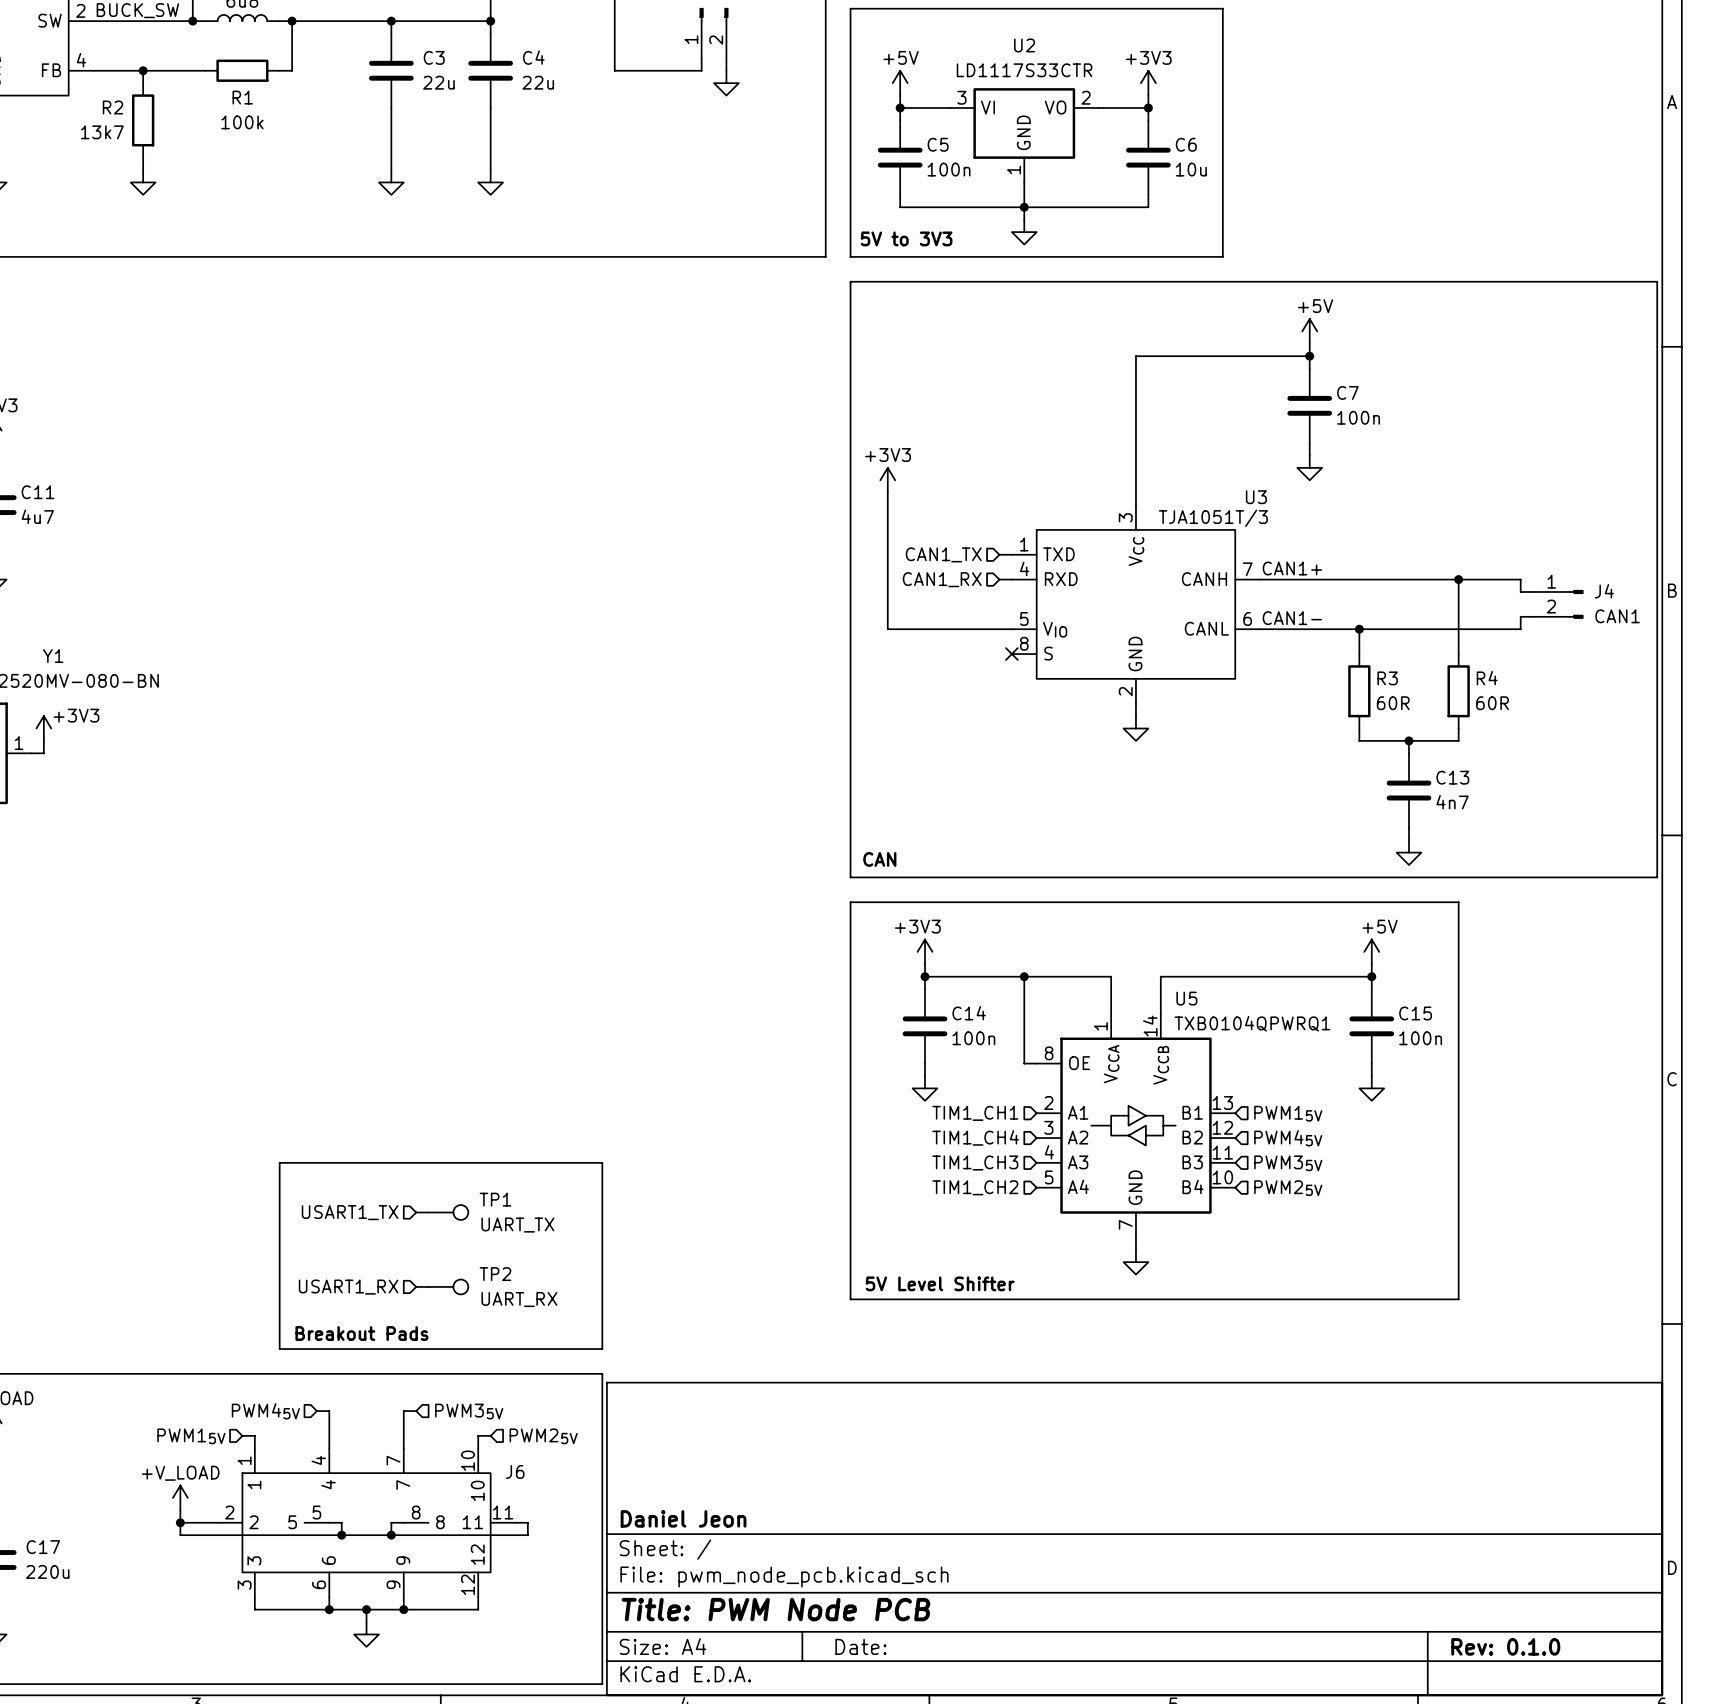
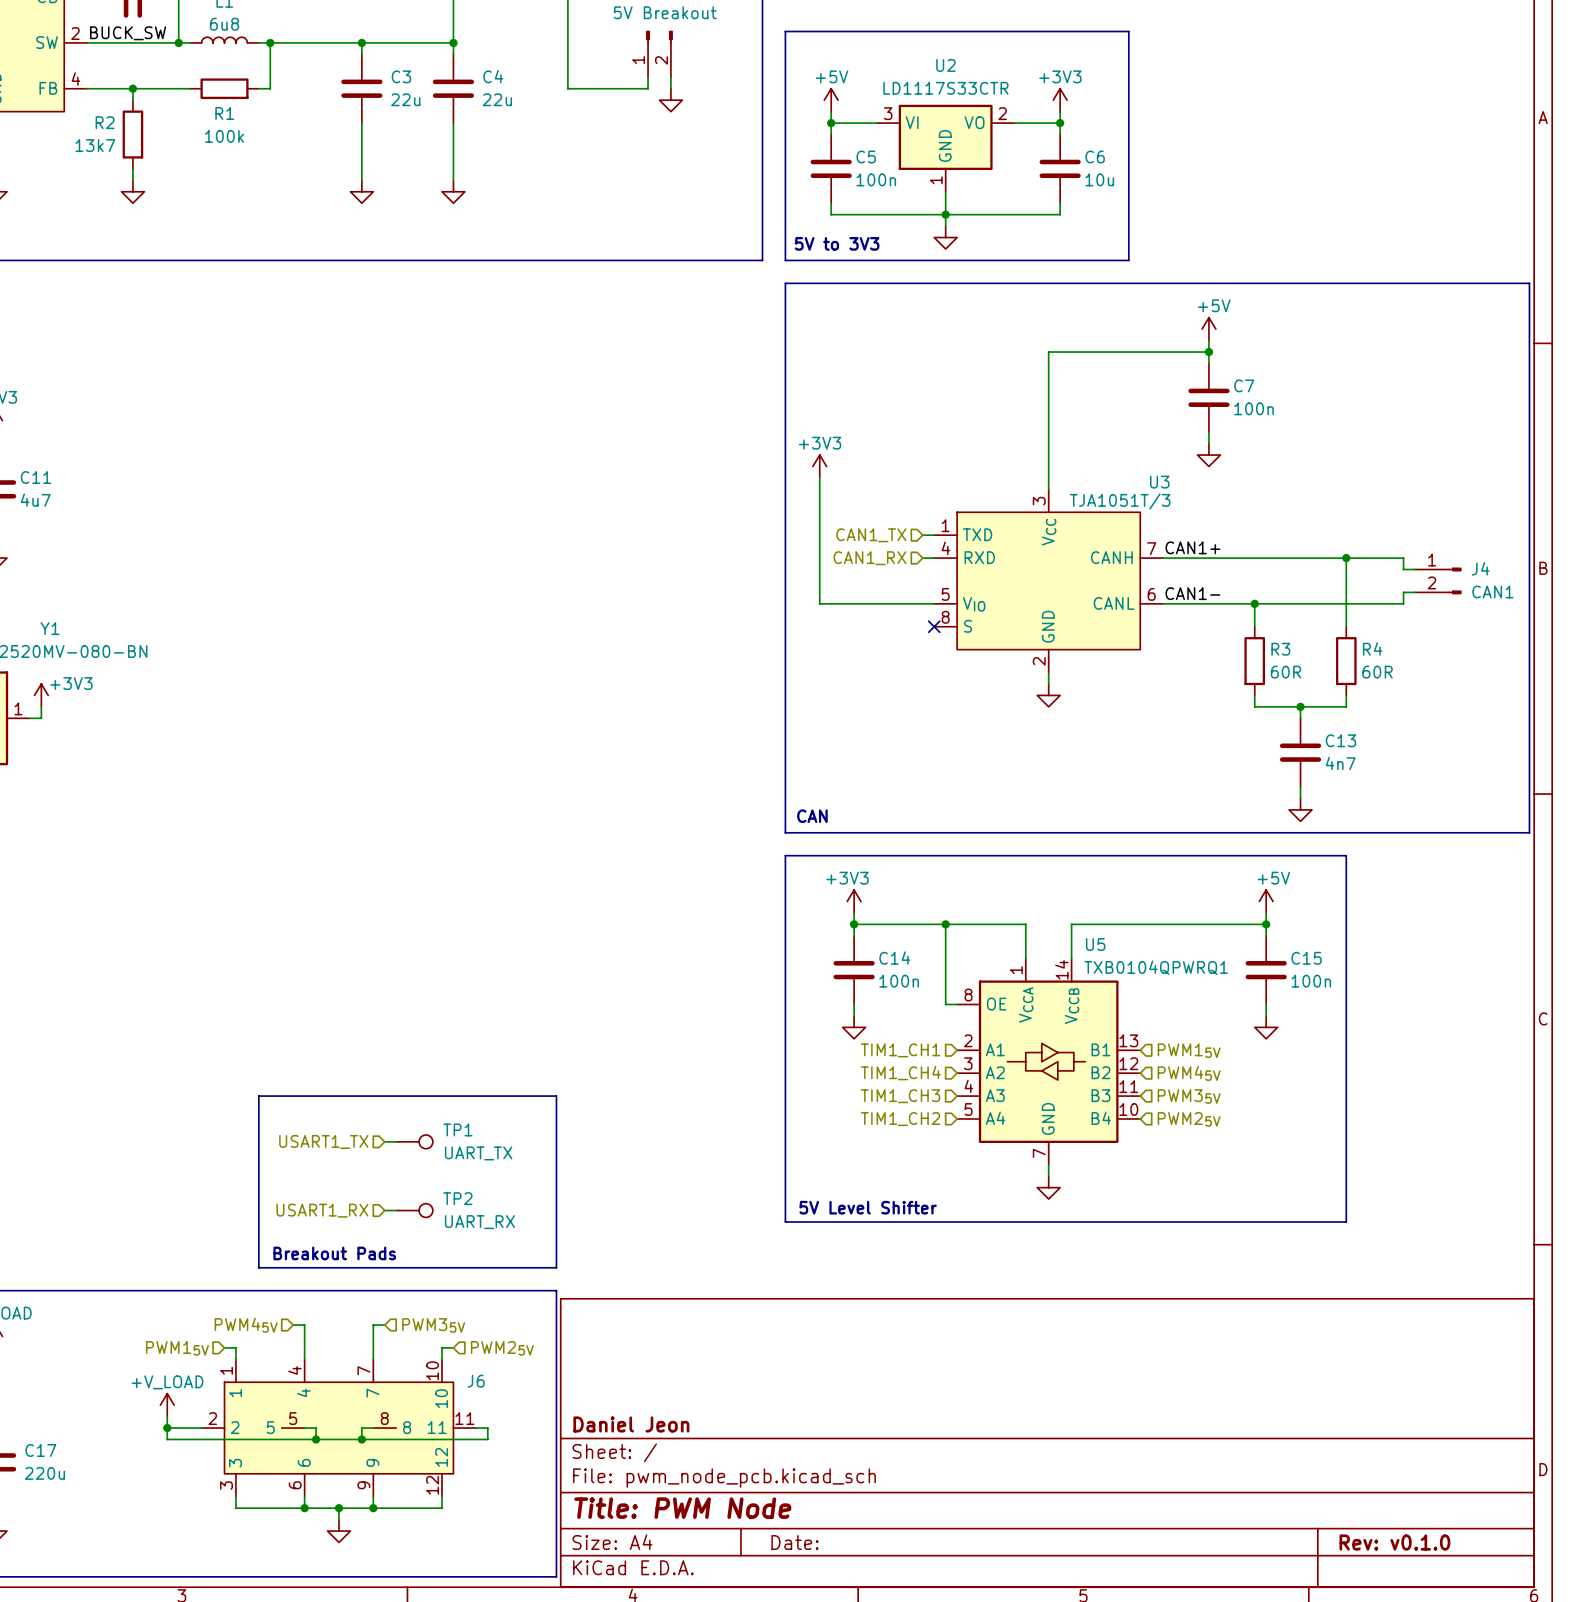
title block: Title: PWM Node PCB (775, 1609) -> Title: PWM Node (682, 1508)
title block: Rev: 0.1.0 (1505, 1646) -> Rev: v0.1.0 (1394, 1542)

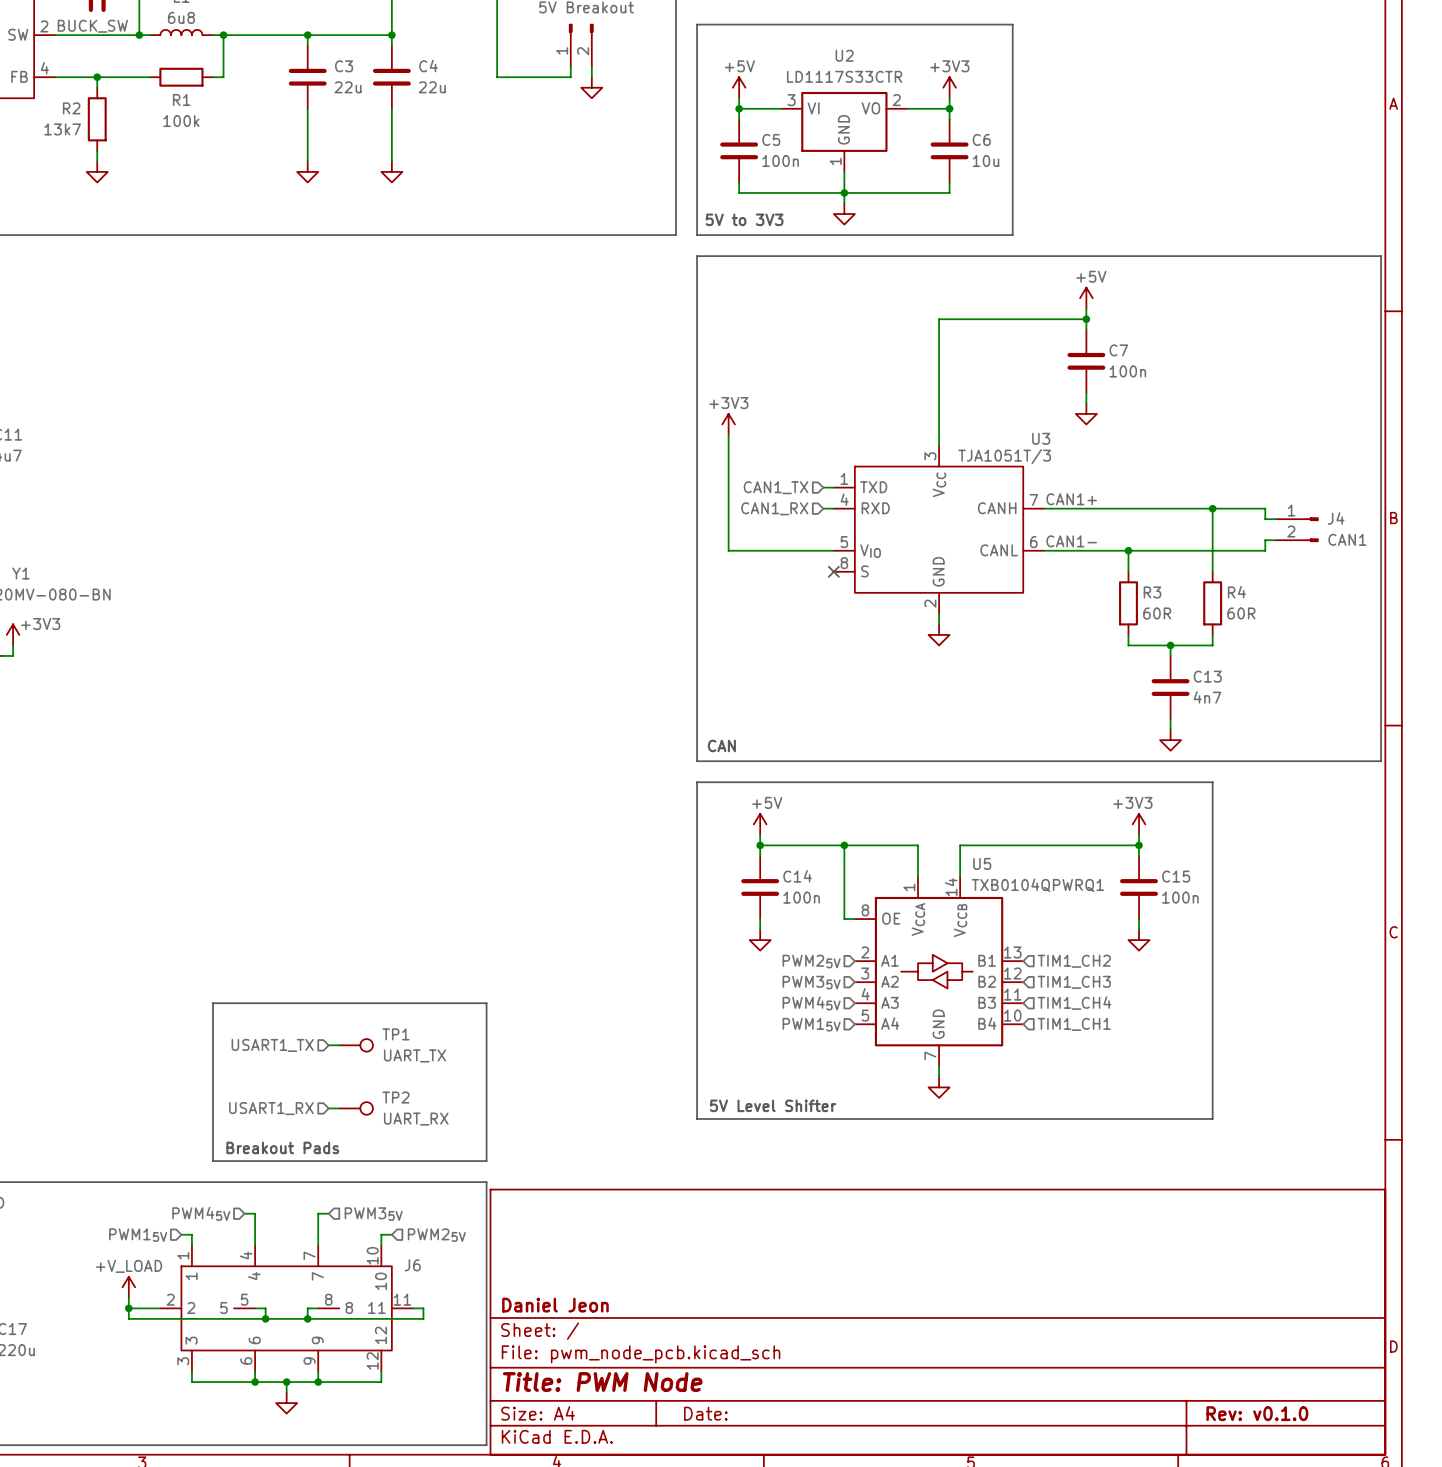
power symbol: +3V3 (854, 901) -> +5V (760, 824)
power symbol: +5V (1266, 901) -> +3V3 (1139, 824)
hierarchical label: TIM1_CH1 (900, 1050) -> PWM25V (811, 961)
hierarchical label: PWM15V (1189, 1050) -> TIM1_CH2 (1074, 961)
hierarchical label: TIM1_CH4 (900, 1073) -> PWM35V (811, 982)
hierarchical label: PWM45V (1189, 1073) -> TIM1_CH3 (1074, 982)
hierarchical label: TIM1_CH3 (900, 1096) -> PWM45V (811, 1003)
hierarchical label: PWM35V (1189, 1096) -> TIM1_CH4 (1074, 1003)
hierarchical label: TIM1_CH2 (900, 1119) -> PWM15V (811, 1024)
hierarchical label: PWM25V (1189, 1119) -> TIM1_CH1 (1074, 1024)

